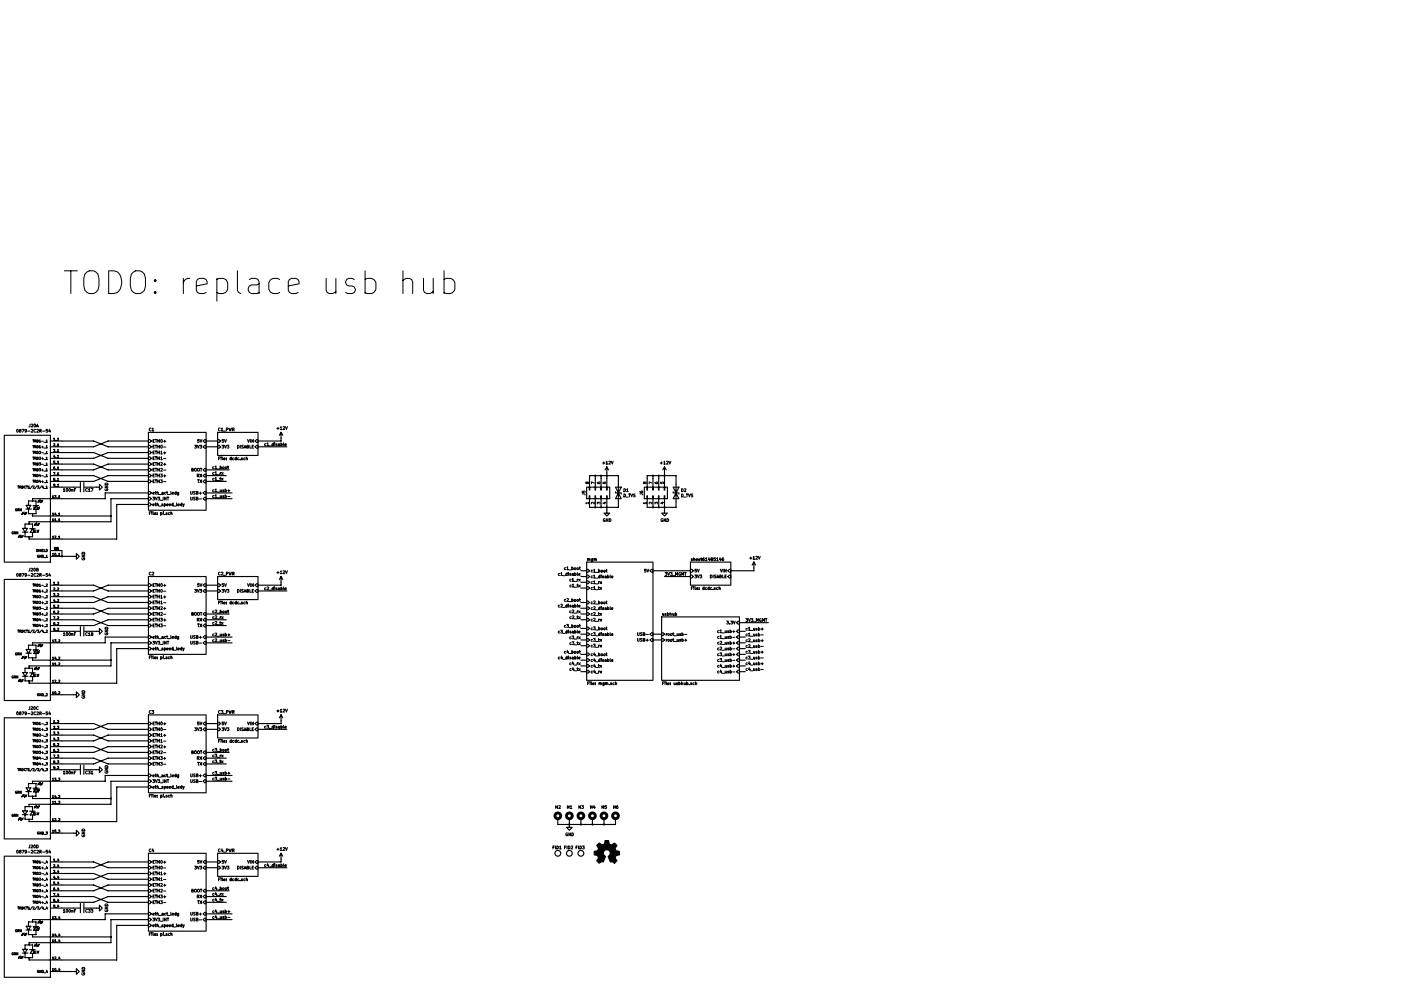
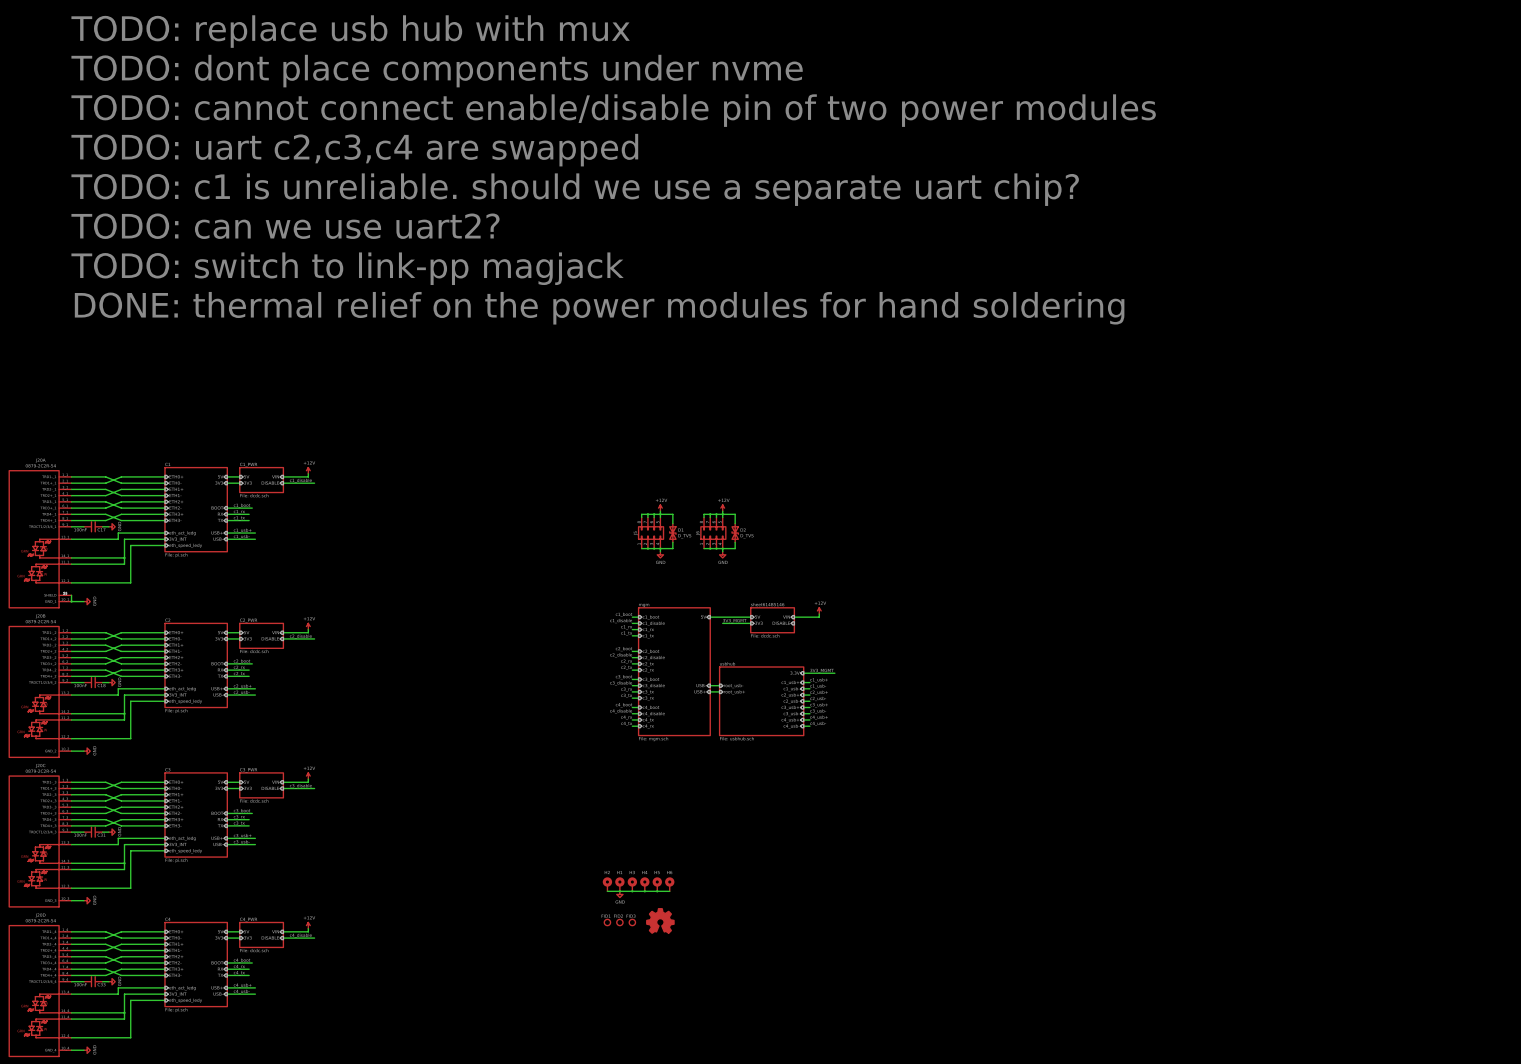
text: none -> TODO: replace usb hub with mux (350, 31)
text: none -> TODO: dont place components under nvme (437, 71)
text: none -> TODO: cannot connect enable/disable pin of two power modules (613, 110)
text: none -> TODO: uart c2,c3,c4 are swapped (354, 150)
text: none -> TODO: c1 is unreliable. should we use a separate uart chip? (575, 189)
text: none -> TODO: can we use uart2? (285, 226)
text: none -> TODO: switch to link-pp magjack (347, 268)
text: TODO: replace usb hub (259, 285) -> DONE: thermal relief on the power modules for hand soldering (599, 308)

